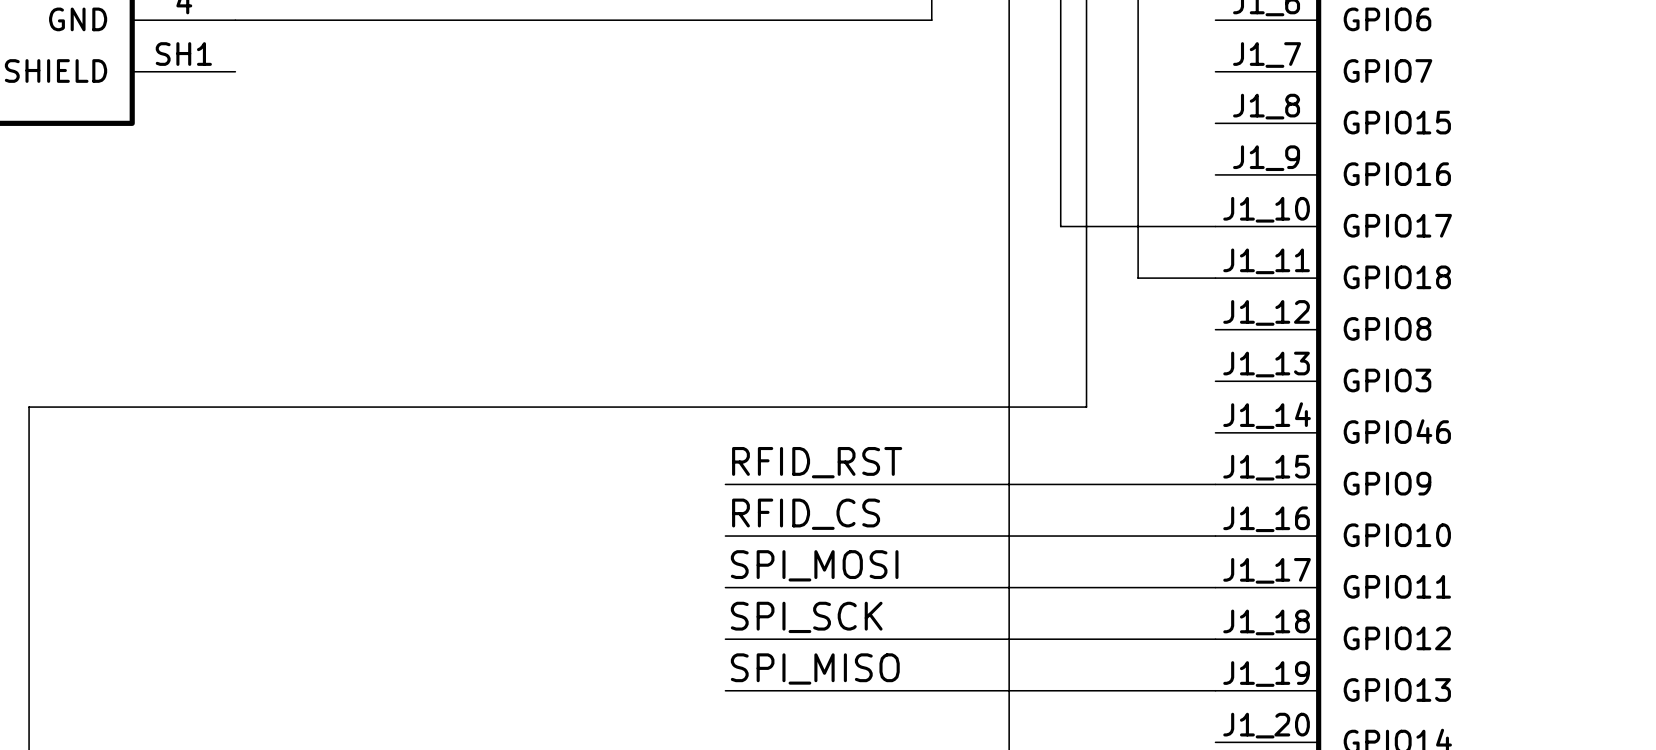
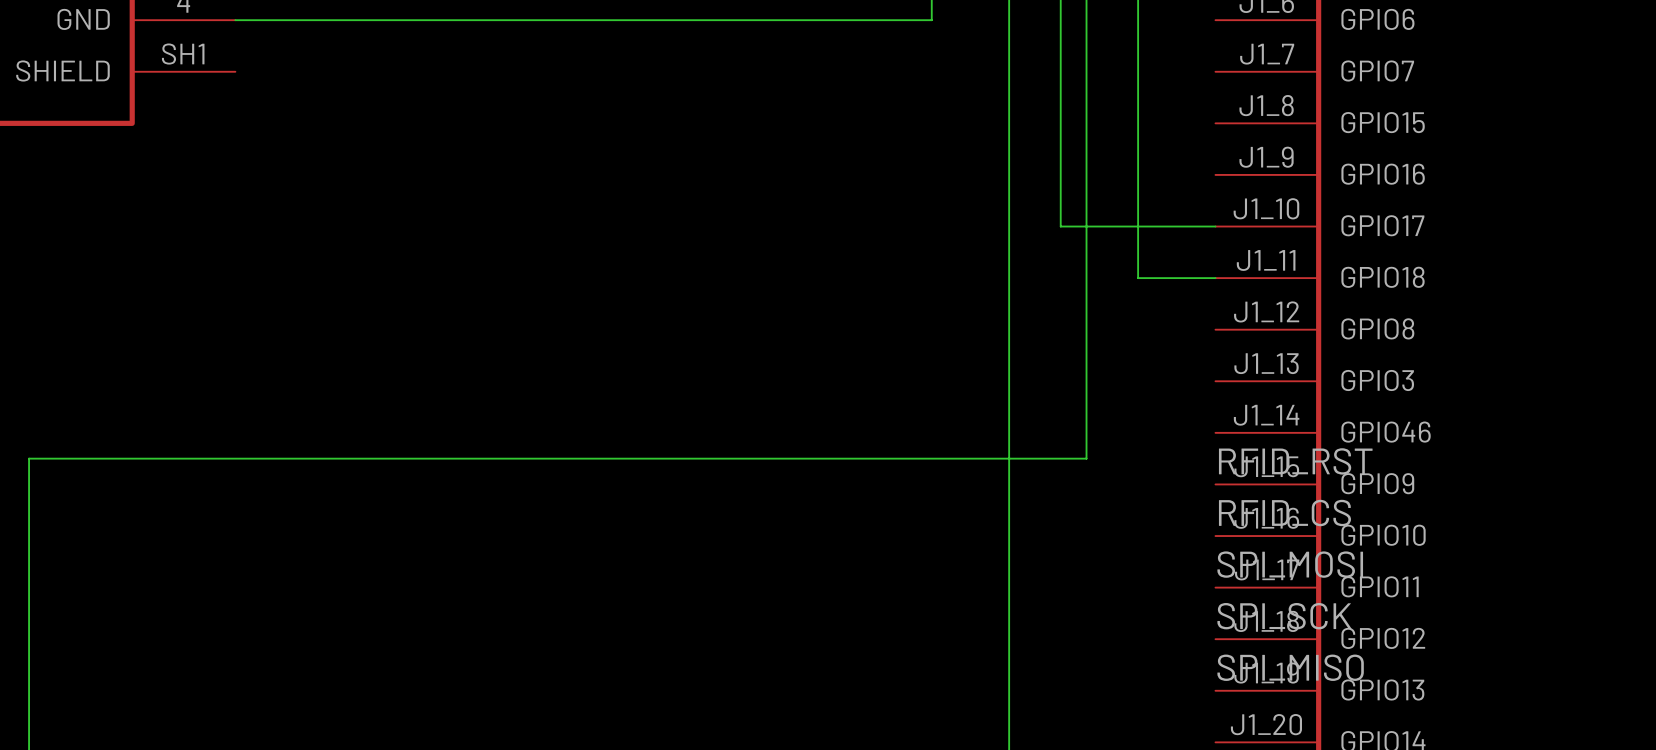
wire: (1086, 407) (29, 407) (29, 458) -> (1086, 407) (1086, 458) (29, 458)
label position: RFID_RST (817, 462) -> RFID_RST (1295, 461)
wire: (725, 484) (1215, 484) -> none
label position: RFID_CS (806, 514) -> RFID_CS (1284, 513)
wire: (725, 536) (1215, 536) -> none
label position: SPI_MOSI (814, 565) -> SPI_MOSI (1290, 564)
wire: (725, 587) (1215, 587) -> none
label position: SPI_SCK (806, 617) -> SPI_SCK (1284, 616)
wire: (725, 639) (1215, 639) -> none
label position: SPI_MISO (815, 668) -> SPI_MISO (1290, 667)
wire: (725, 690) (1215, 690) -> none

